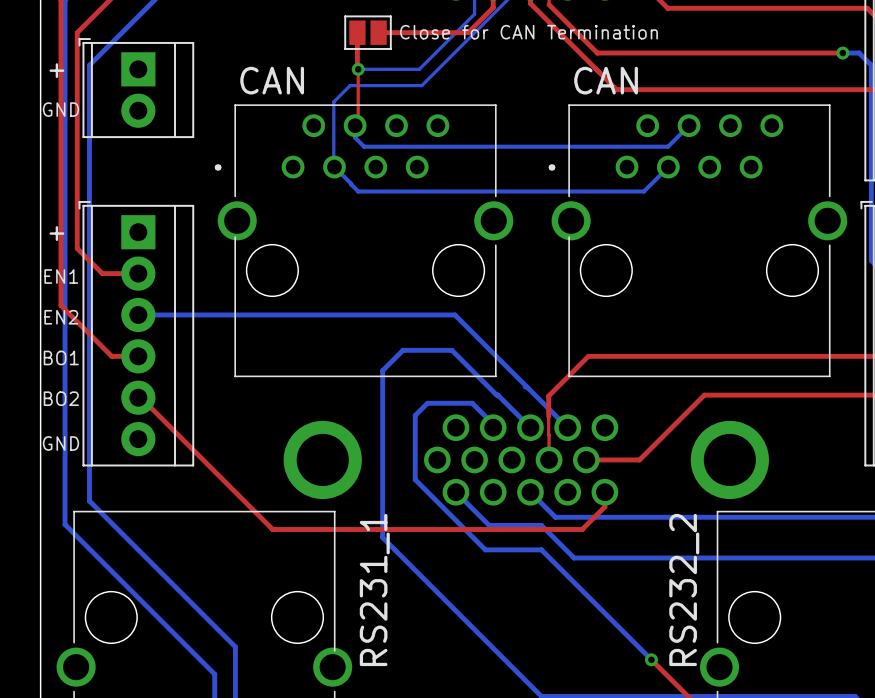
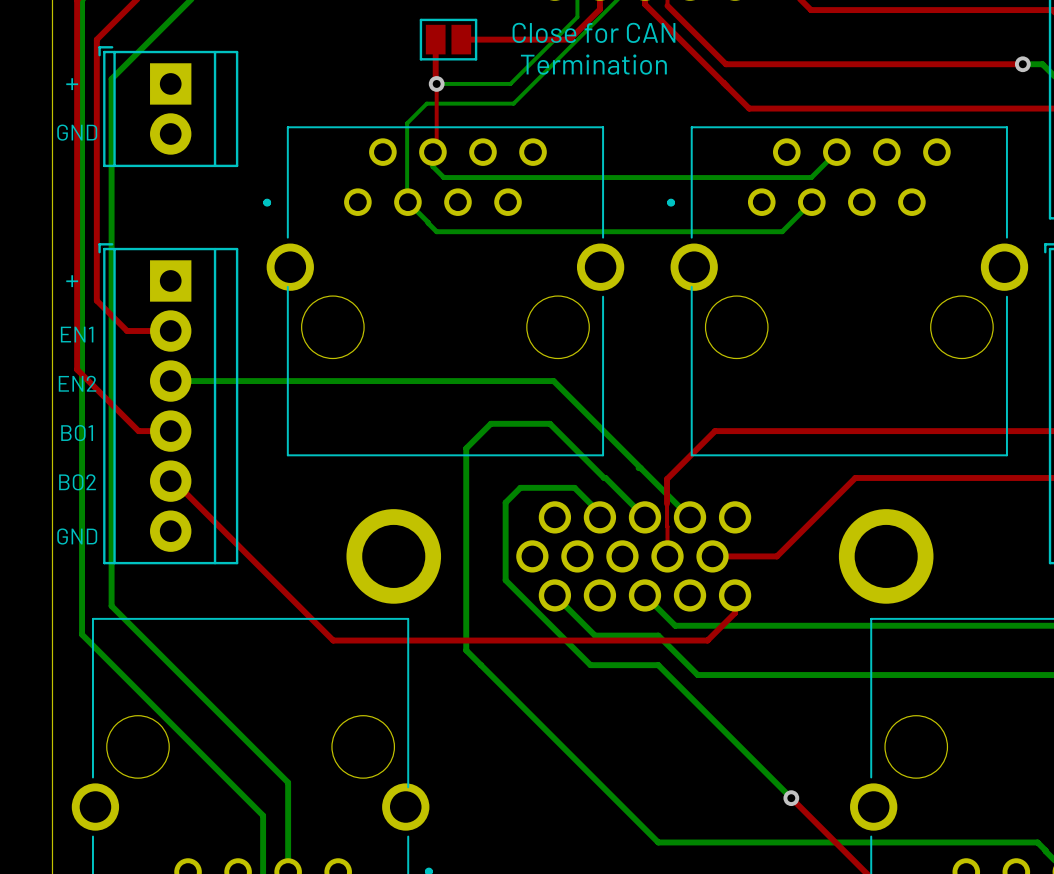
text: none -> Close for CAN (593, 32)
text: Close for CAN Termination (528, 32) -> none
text: none -> Termination (593, 64)
text: CAN (272, 80) -> none
text: CAN (606, 80) -> none
text: RS231_1 (374, 589) -> none
text: RS232_2 (684, 589) -> none

